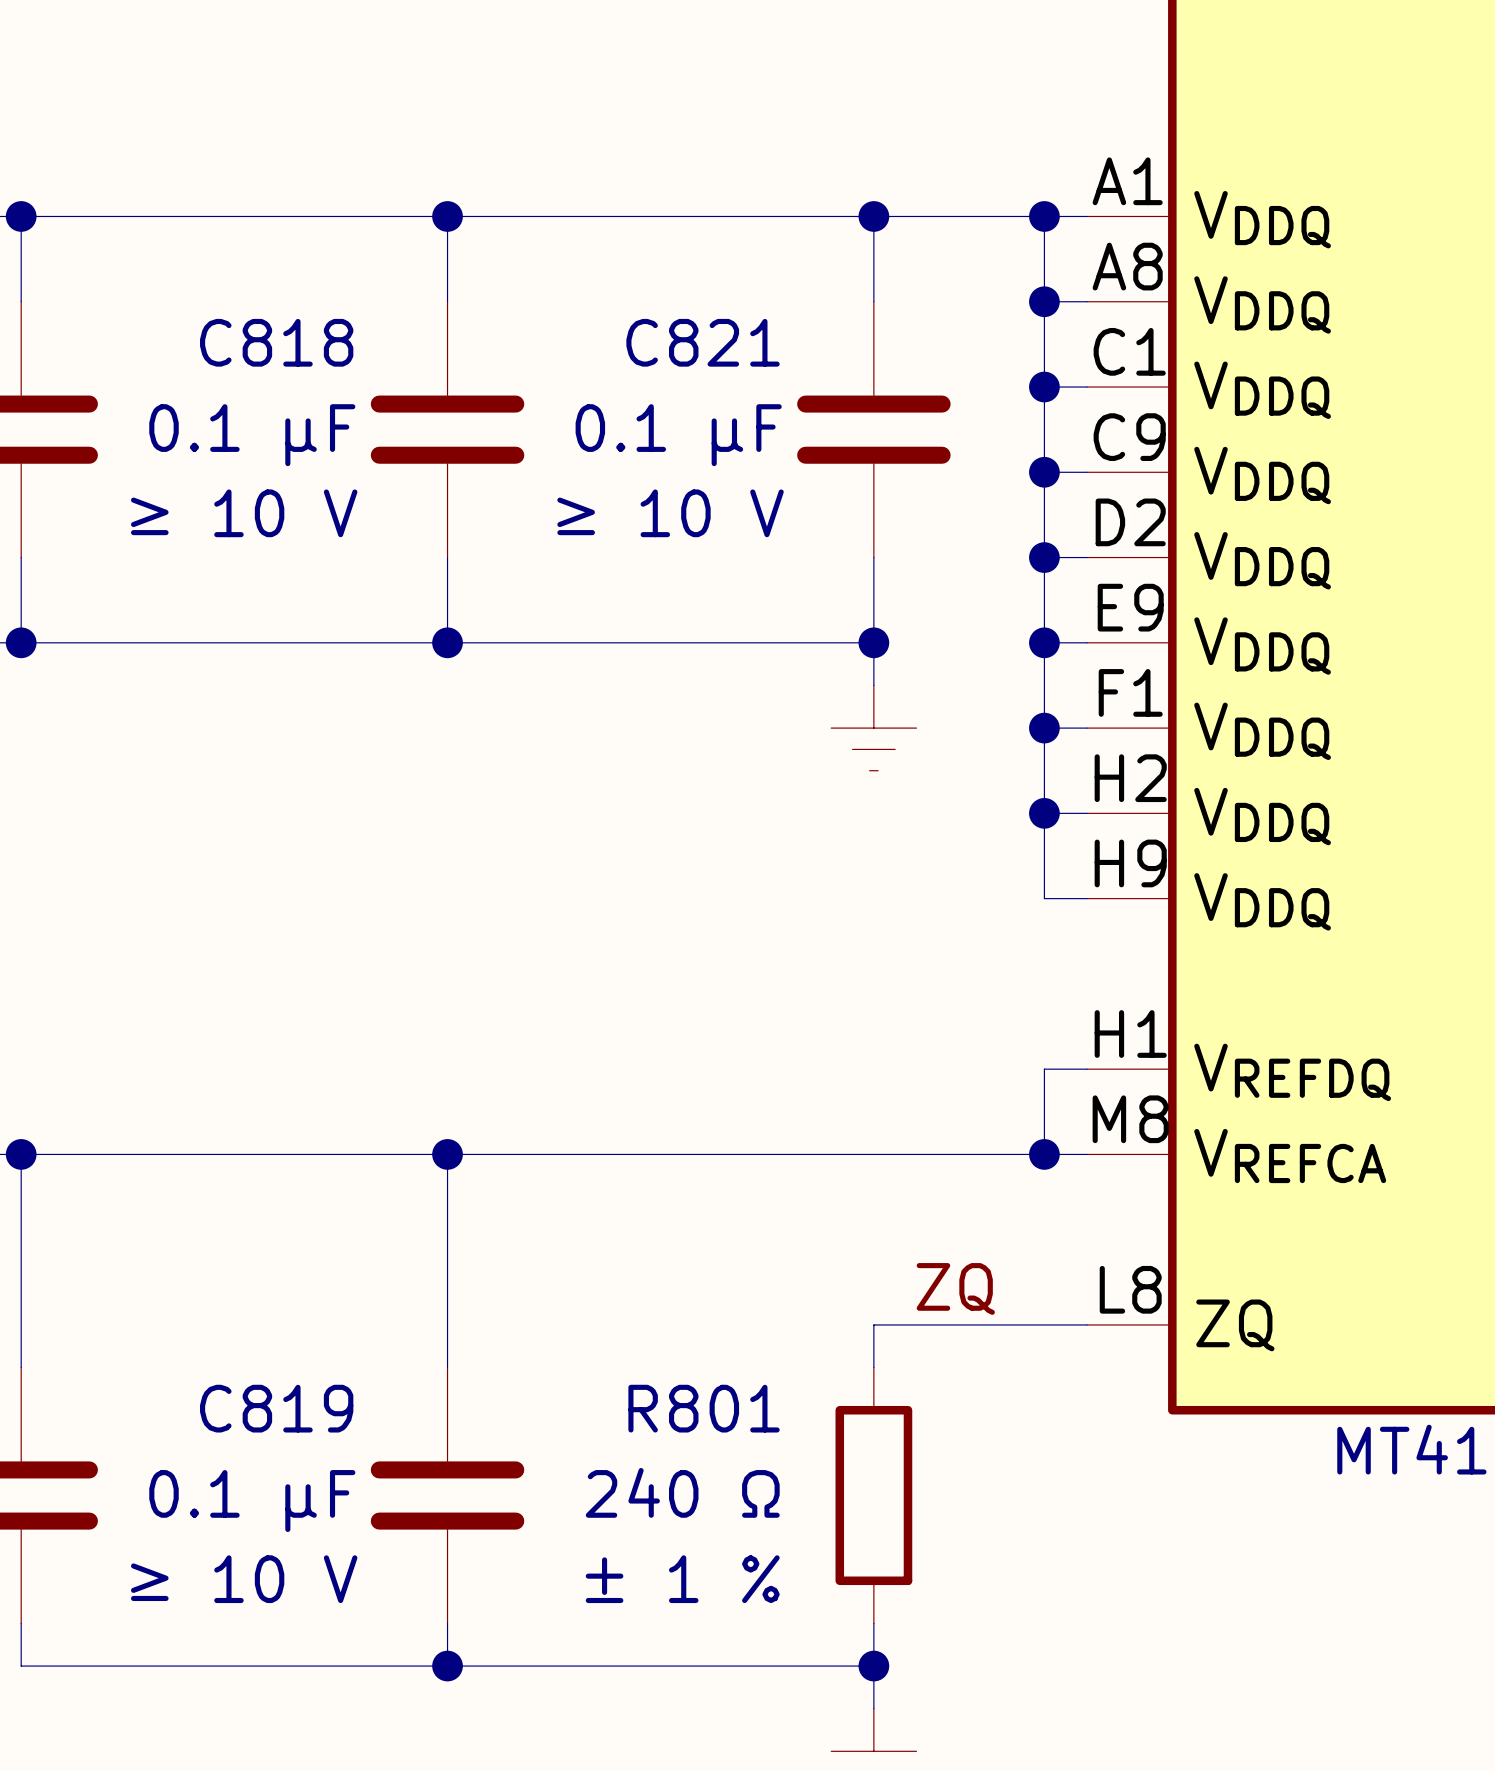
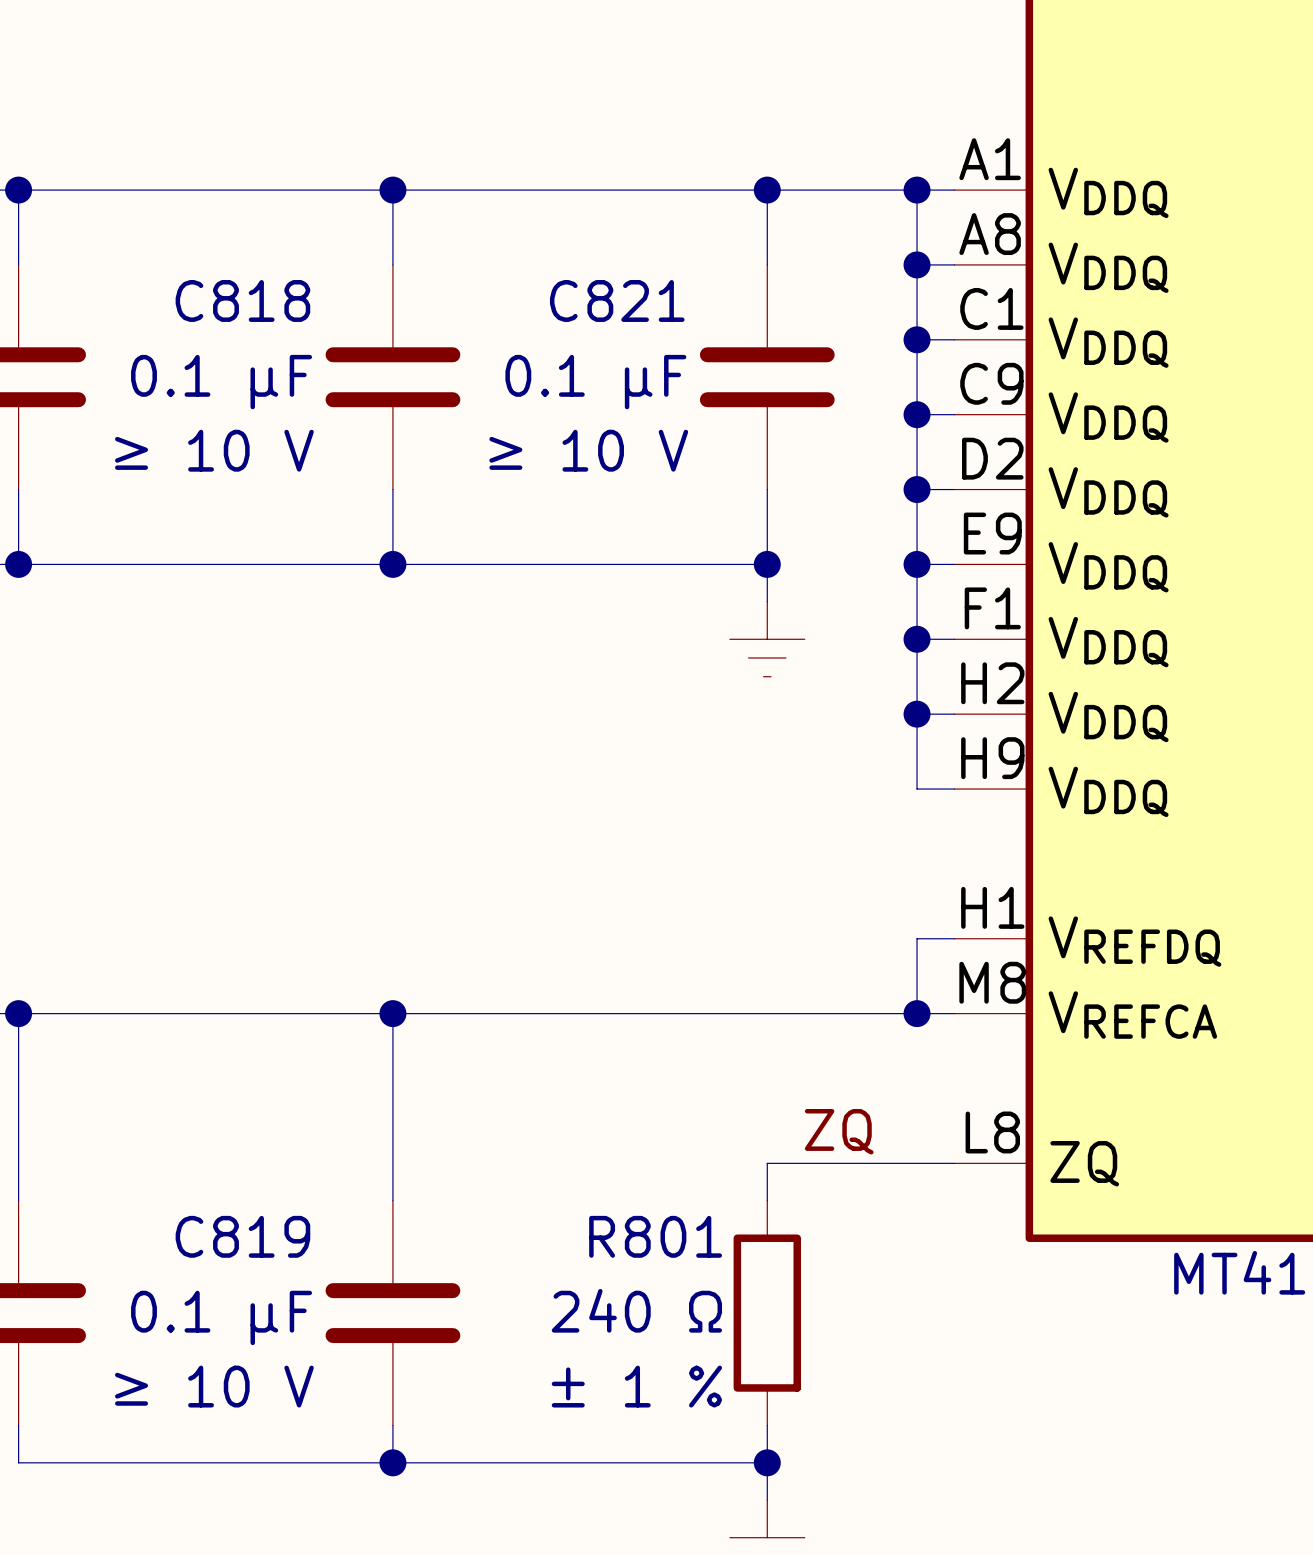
R801 name position: R801 (704, 1408) -> R801 (655, 1236)
R801 value position: 240 Ω (682, 1492) -> 240 Ω (636, 1310)
R801 text position: ± 1 % (682, 1579) -> ± 1 % (636, 1386)

